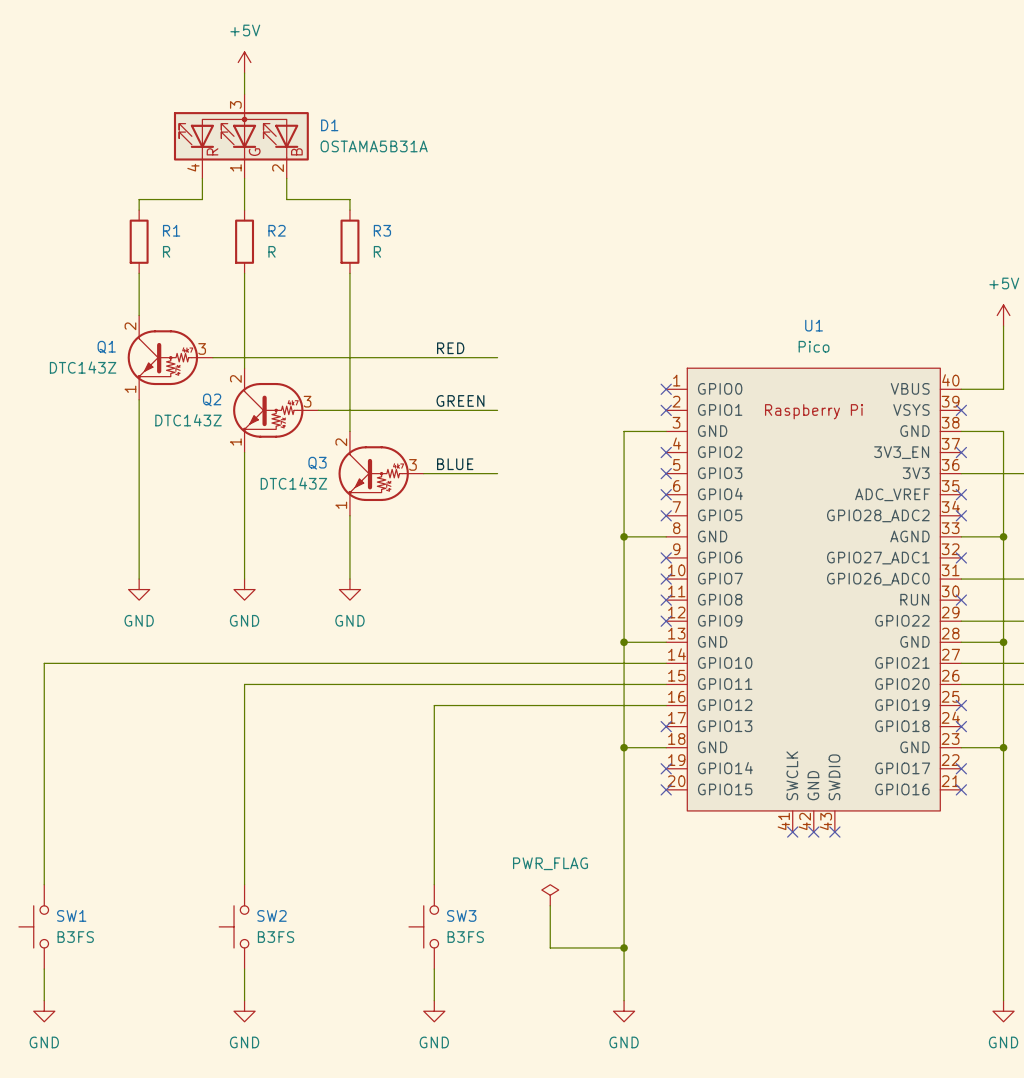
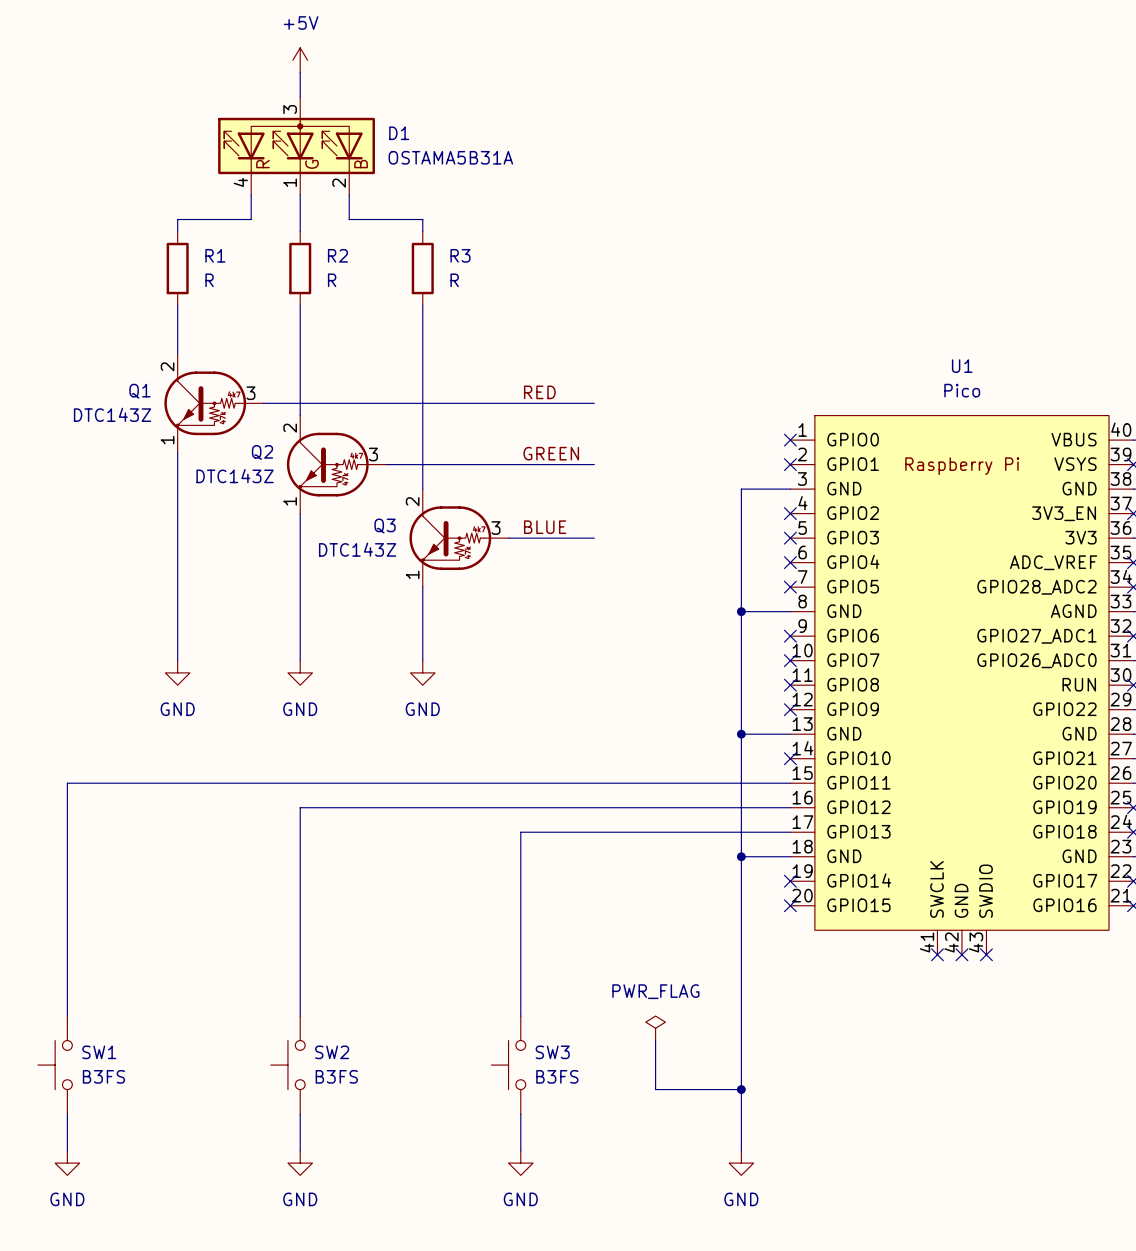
wire: (666, 663) (44, 663) (44, 684) -> (300, 783) (67, 783)
no-connect mark: none -> (790, 758)
wire: (244, 684) (244, 705) -> (520, 807) (300, 807)
wire: (434, 705) (434, 726) -> (790, 832) (520, 832)
no-connect mark: (666, 726) -> none

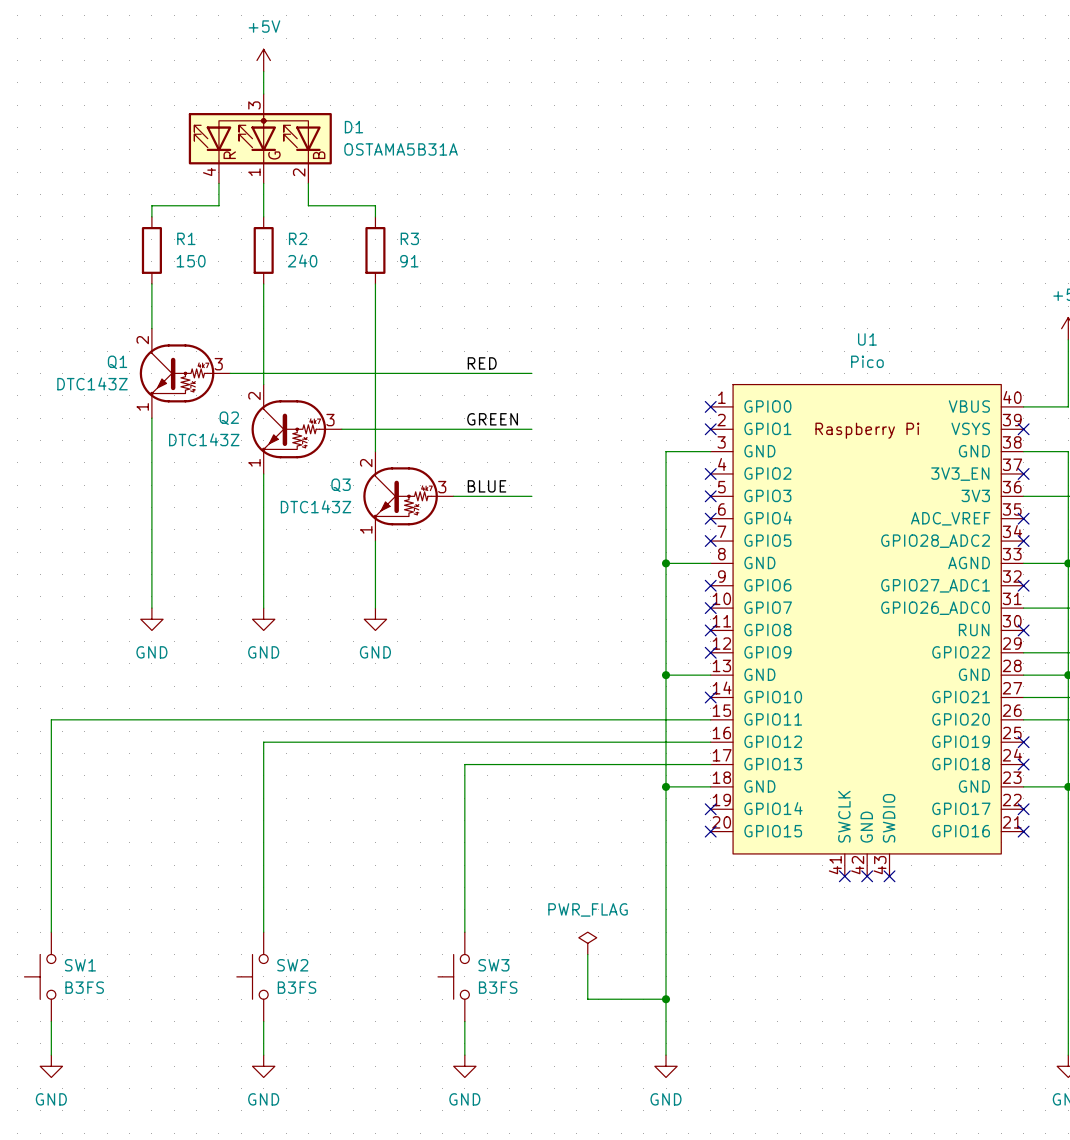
R1 value: R (209, 280) -> 150 (191, 261)
R2 value: R (332, 280) -> 240 (302, 260)
R3 value: R (454, 280) -> 91 (409, 261)

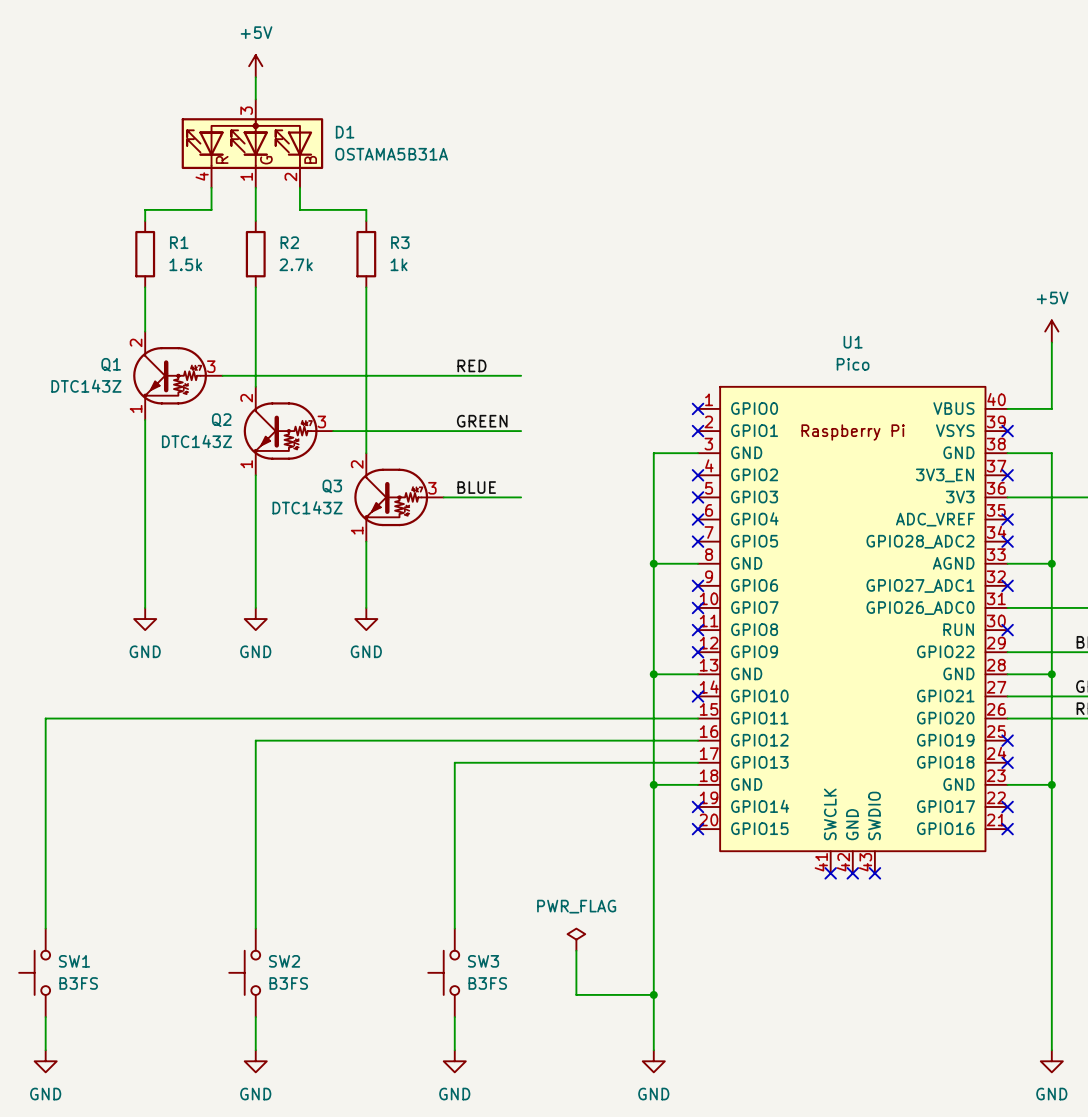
R2 value: 240 (302, 260) -> 2.7k (296, 264)
R1 value: 150 (191, 261) -> 1.5k (185, 264)
R3 value: 91 (409, 261) -> 1k (399, 264)

